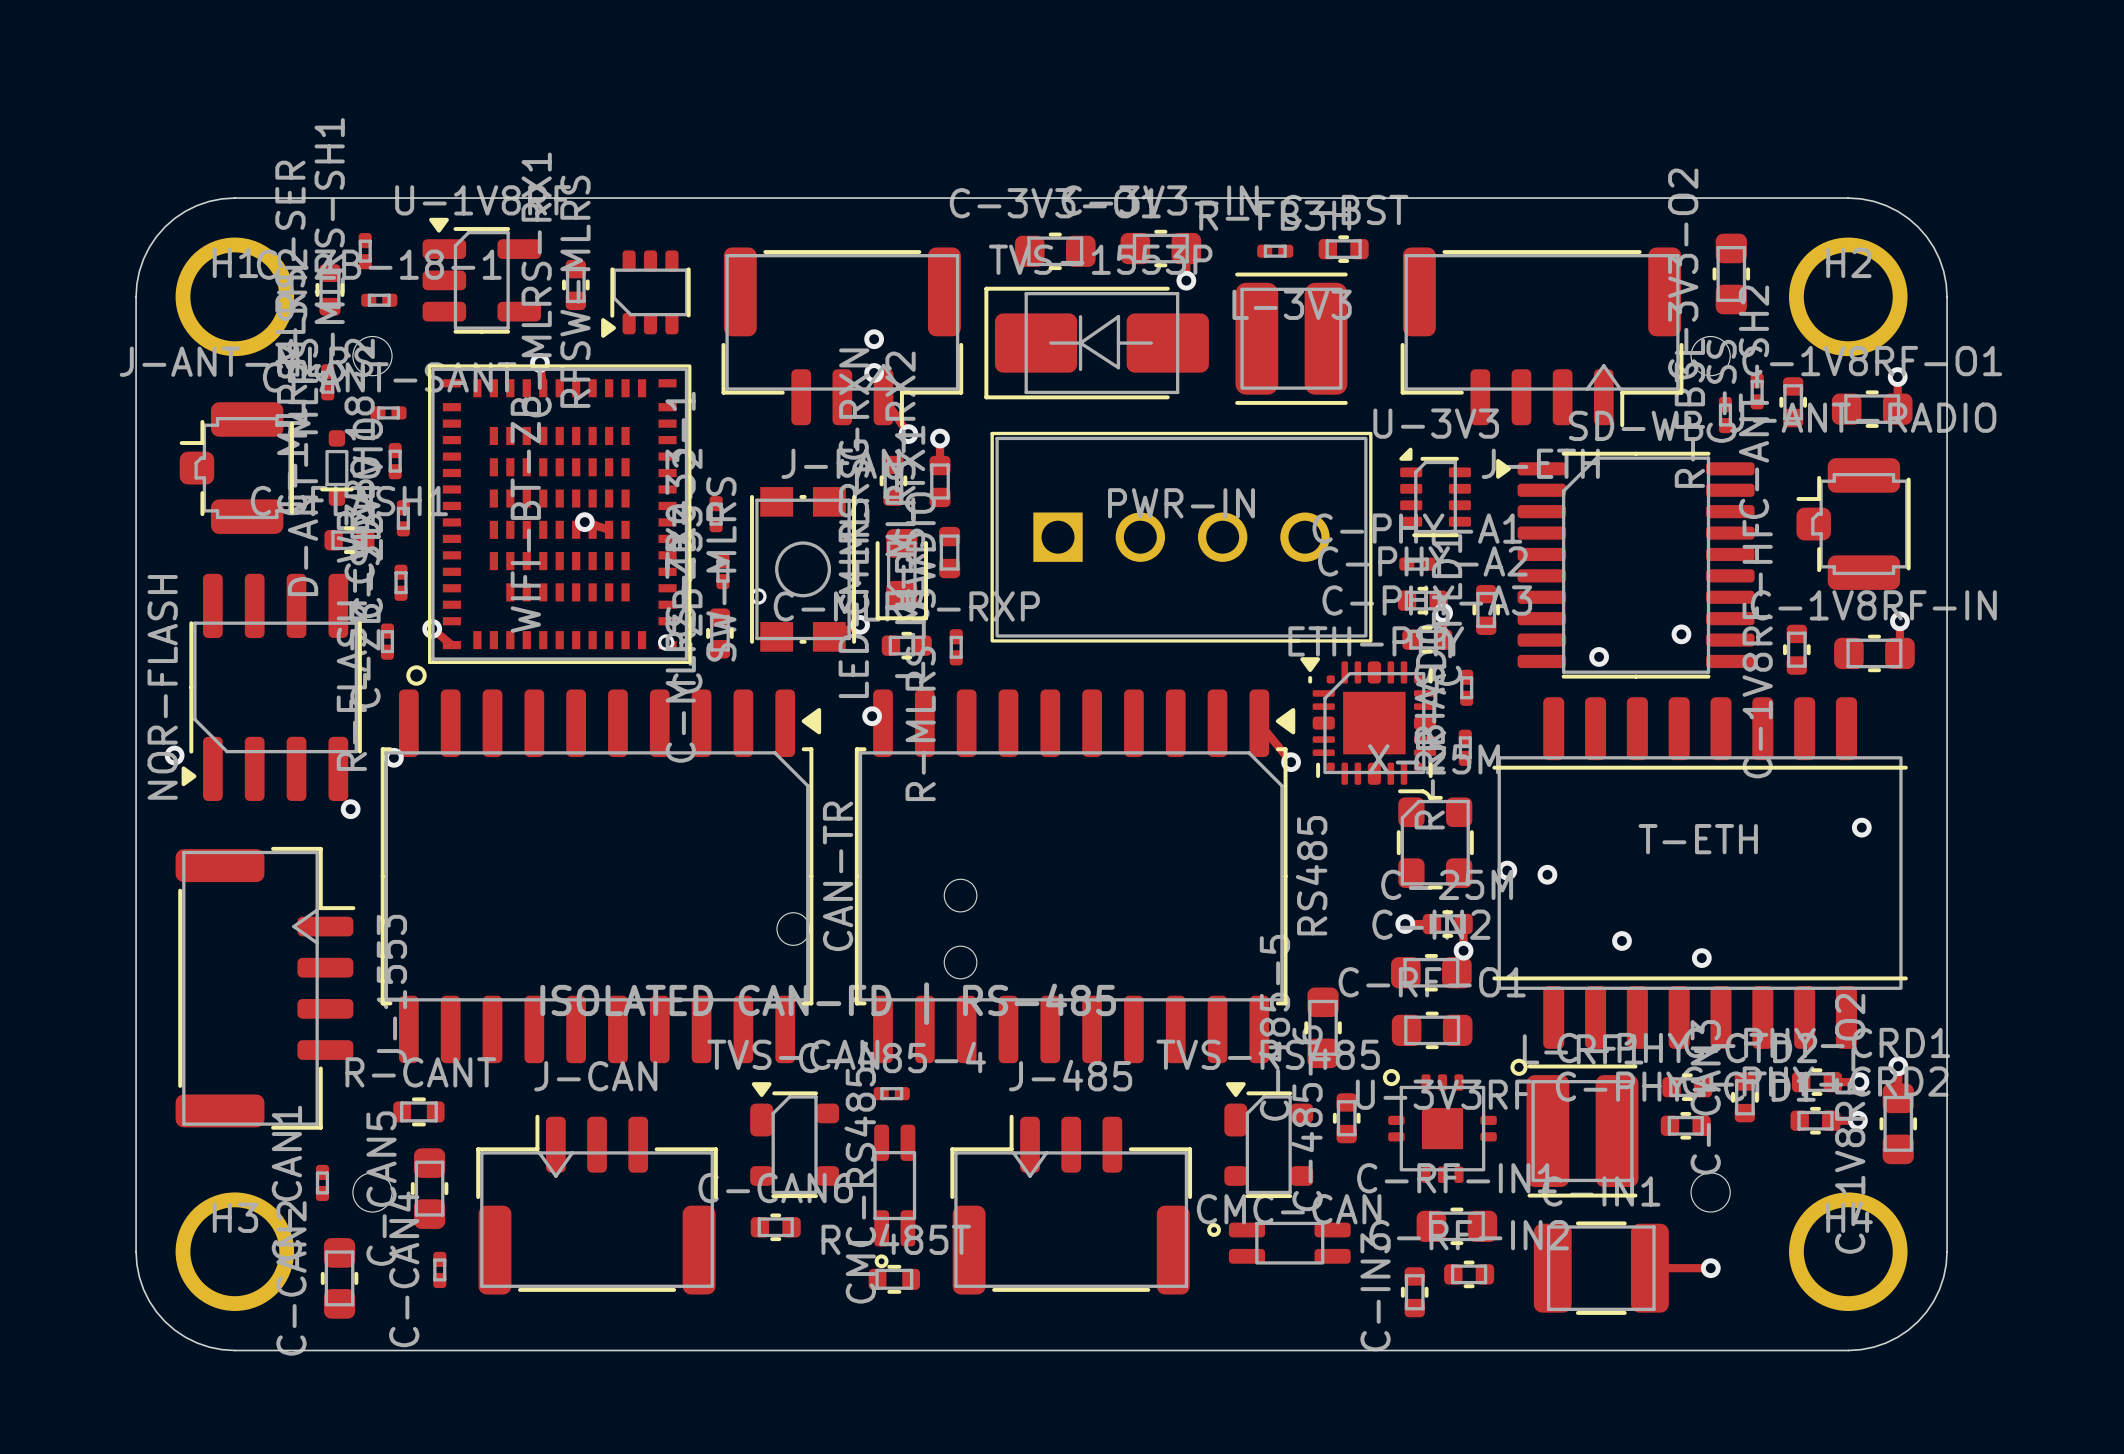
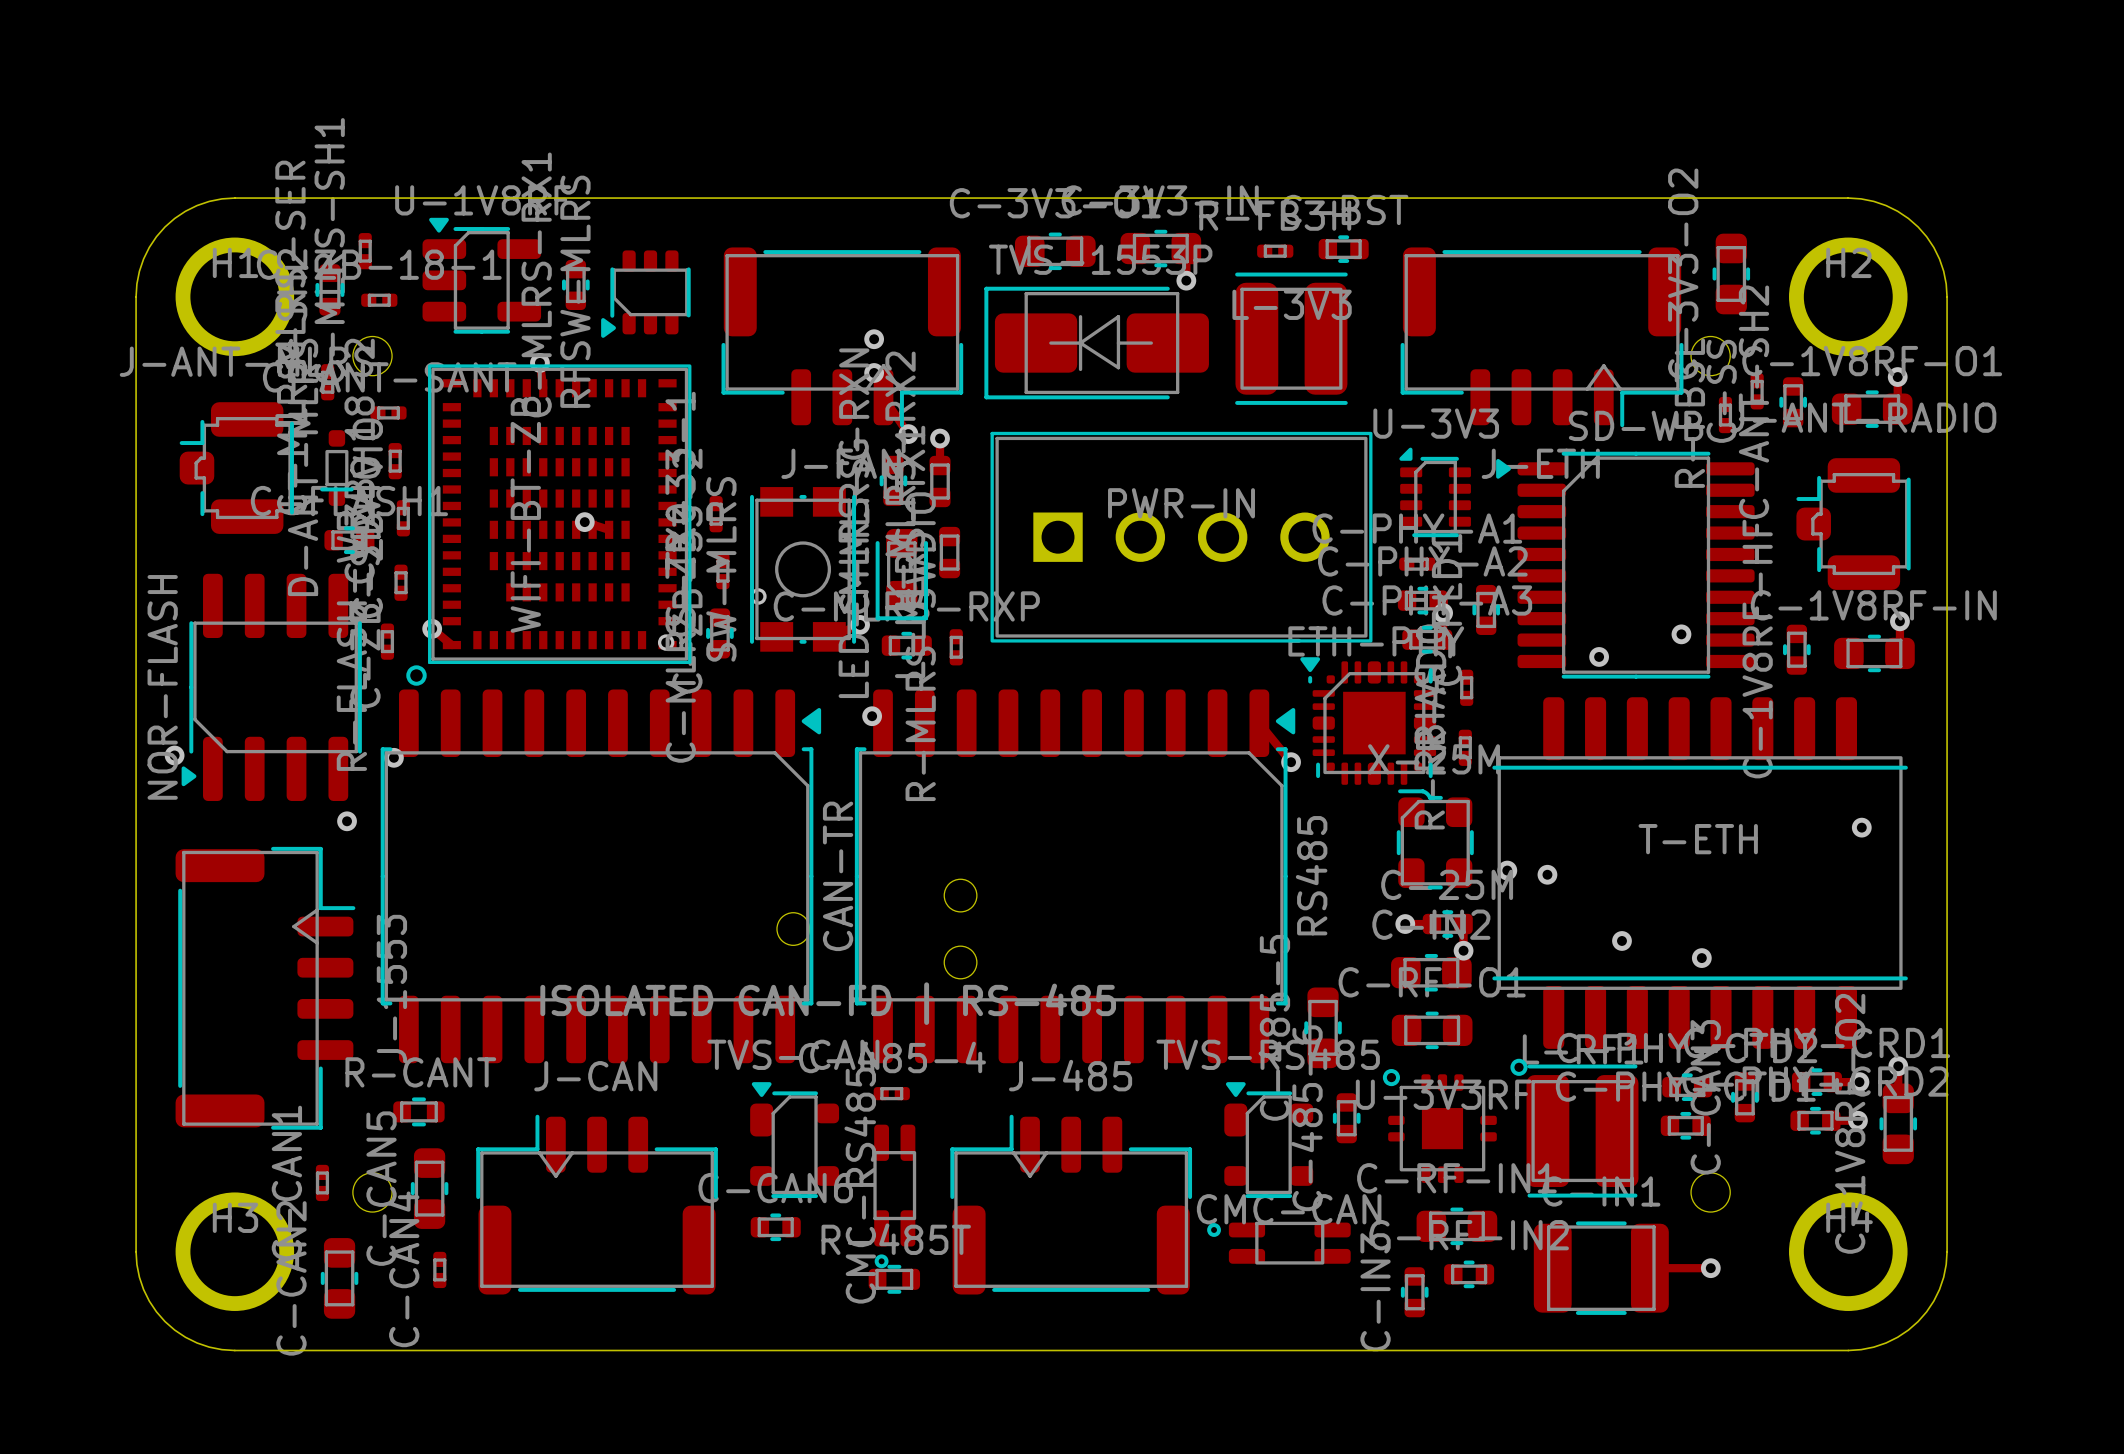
via position: (350, 809) -> (347, 821)

